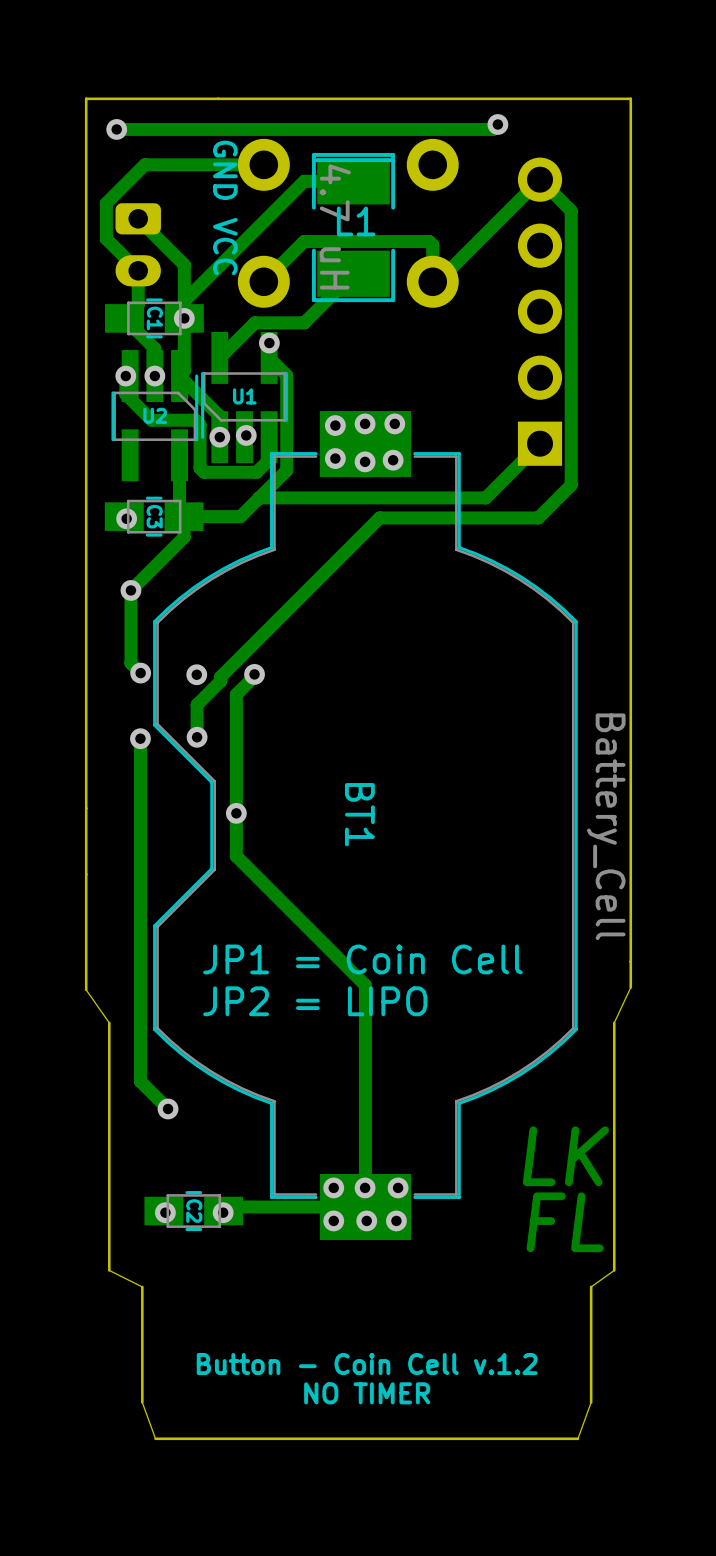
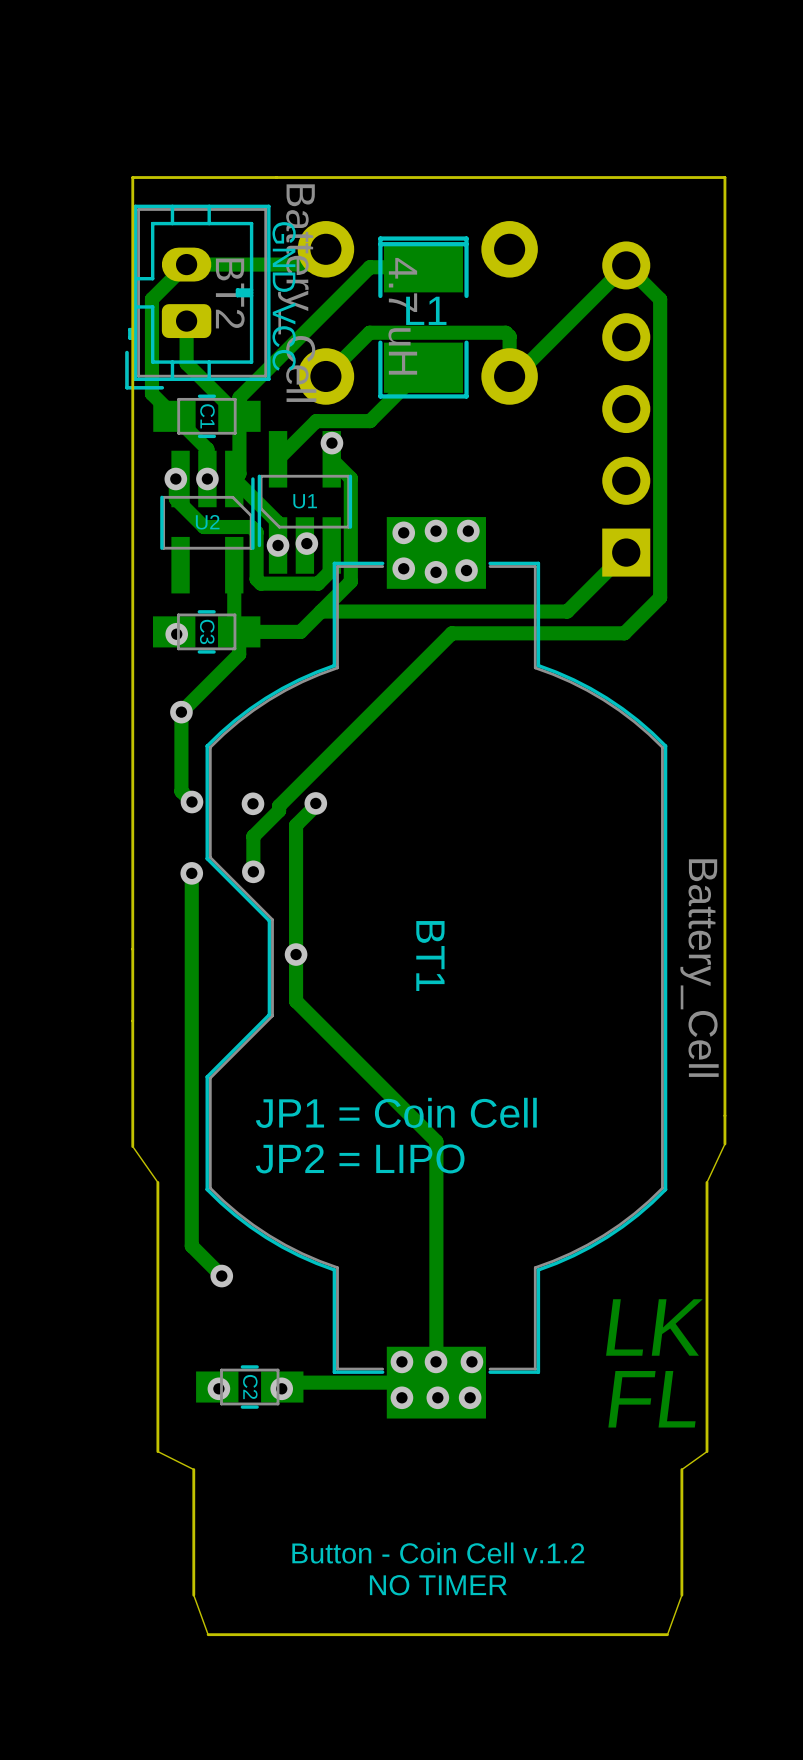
track: (498, 123) (492, 129) (116, 129) -> none
via: (497, 124) -> none
via: (116, 129) -> none
track: (263, 164) (144, 164) (106, 203) (106, 238) (138, 270) (138, 304) (124, 318) -> (325, 249) (310, 264) (186, 264) (151, 299) (151, 393) (174, 416)
track: (138, 218) (184, 264) (184, 301) -> none
track: none -> (186, 321) (186, 363) (239, 416)
BT2 side: top (138, 244) -> bottom (197, 297)
via: (184, 318) -> none

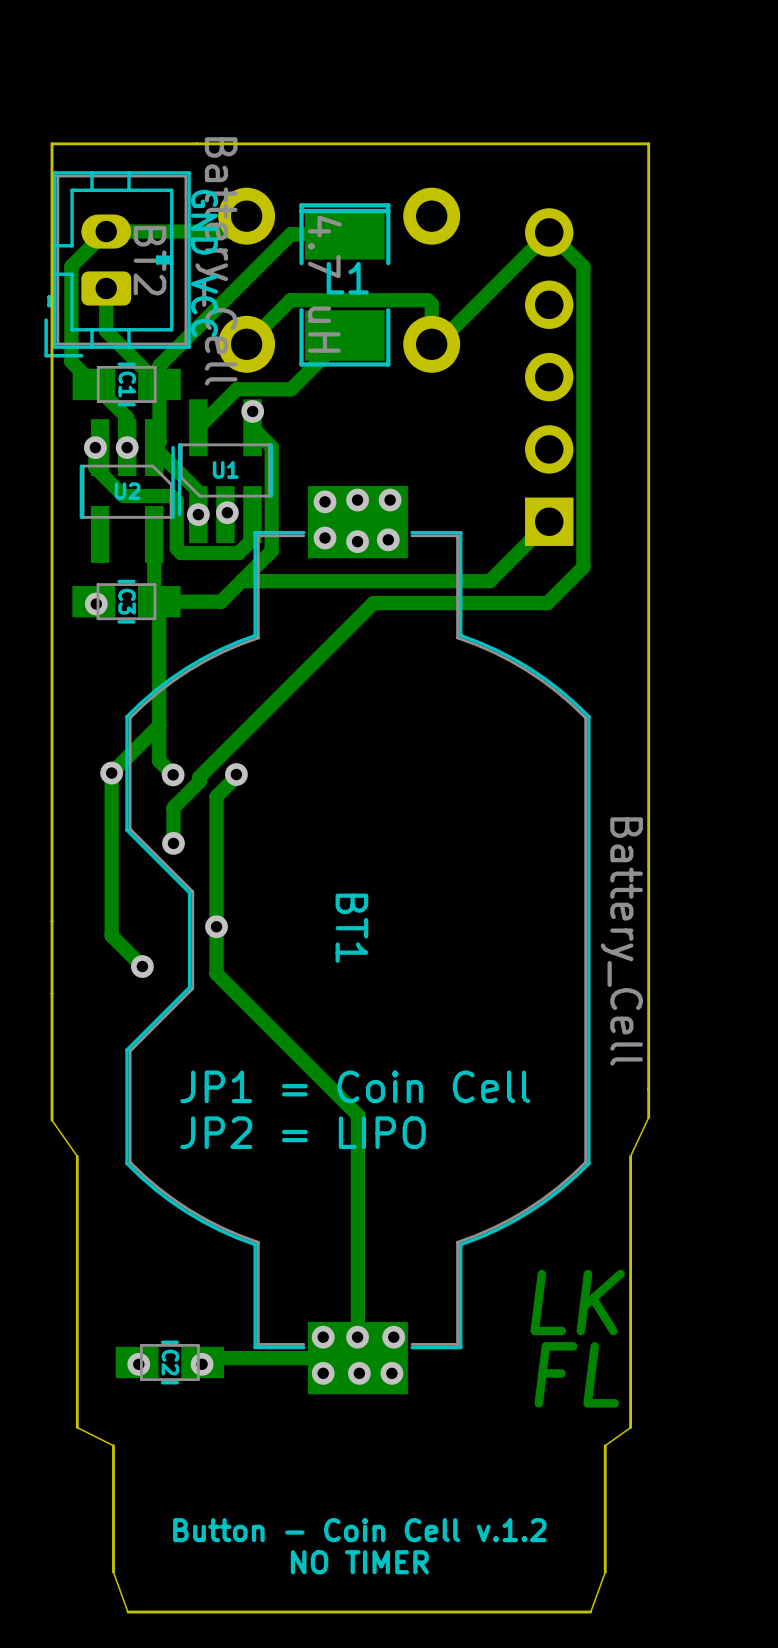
track: (239, 654) (181, 712) (181, 791) (191, 802) -> (159, 624) (159, 760) (173, 774)
via: (181, 712) -> none
track: none -> (159, 725) (111, 773) (111, 935) (142, 966)
track: (191, 873) (191, 1246) (221, 1276) -> none
via position: (191, 873) -> (142, 966)
via: (221, 1276) -> none

